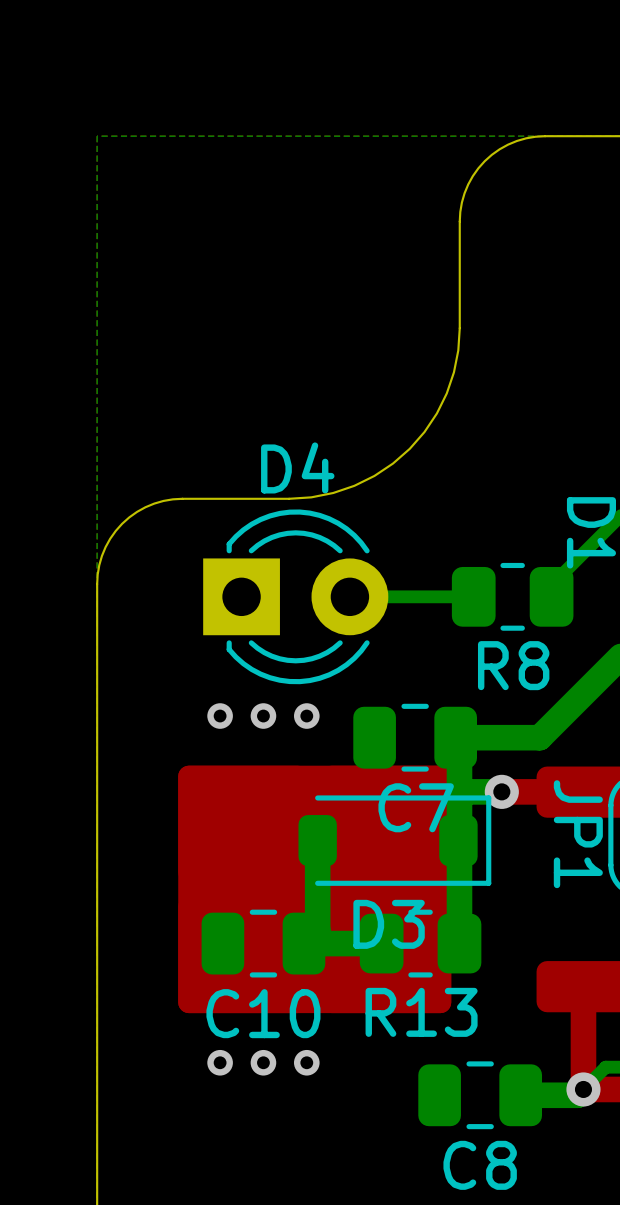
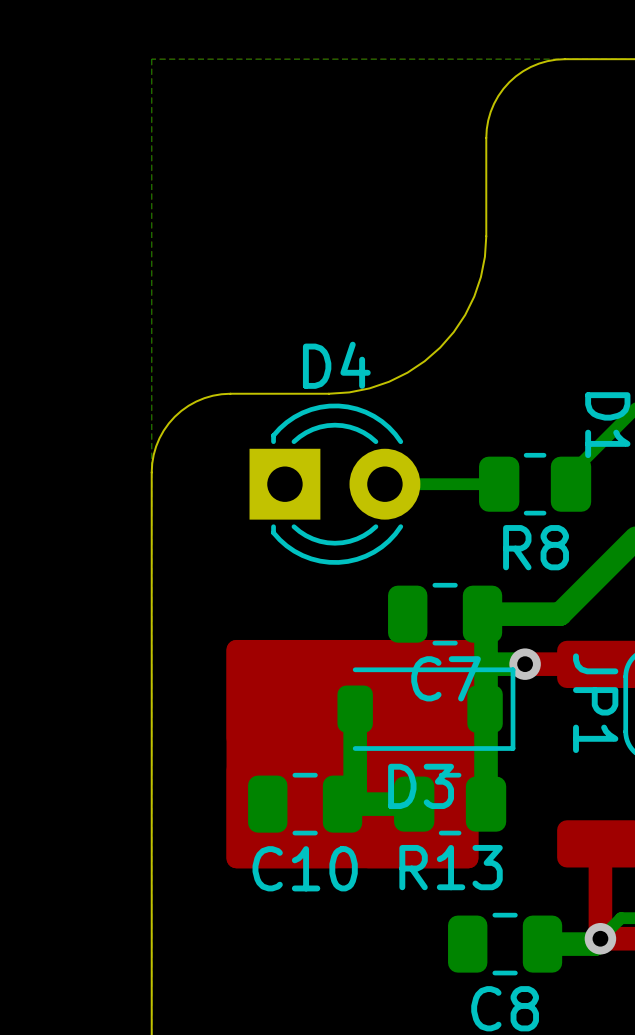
via: (220, 716) -> none
via: (263, 716) -> none
via: (306, 716) -> none
via: (220, 1062) -> none
via: (263, 1062) -> none
via: (306, 1062) -> none

